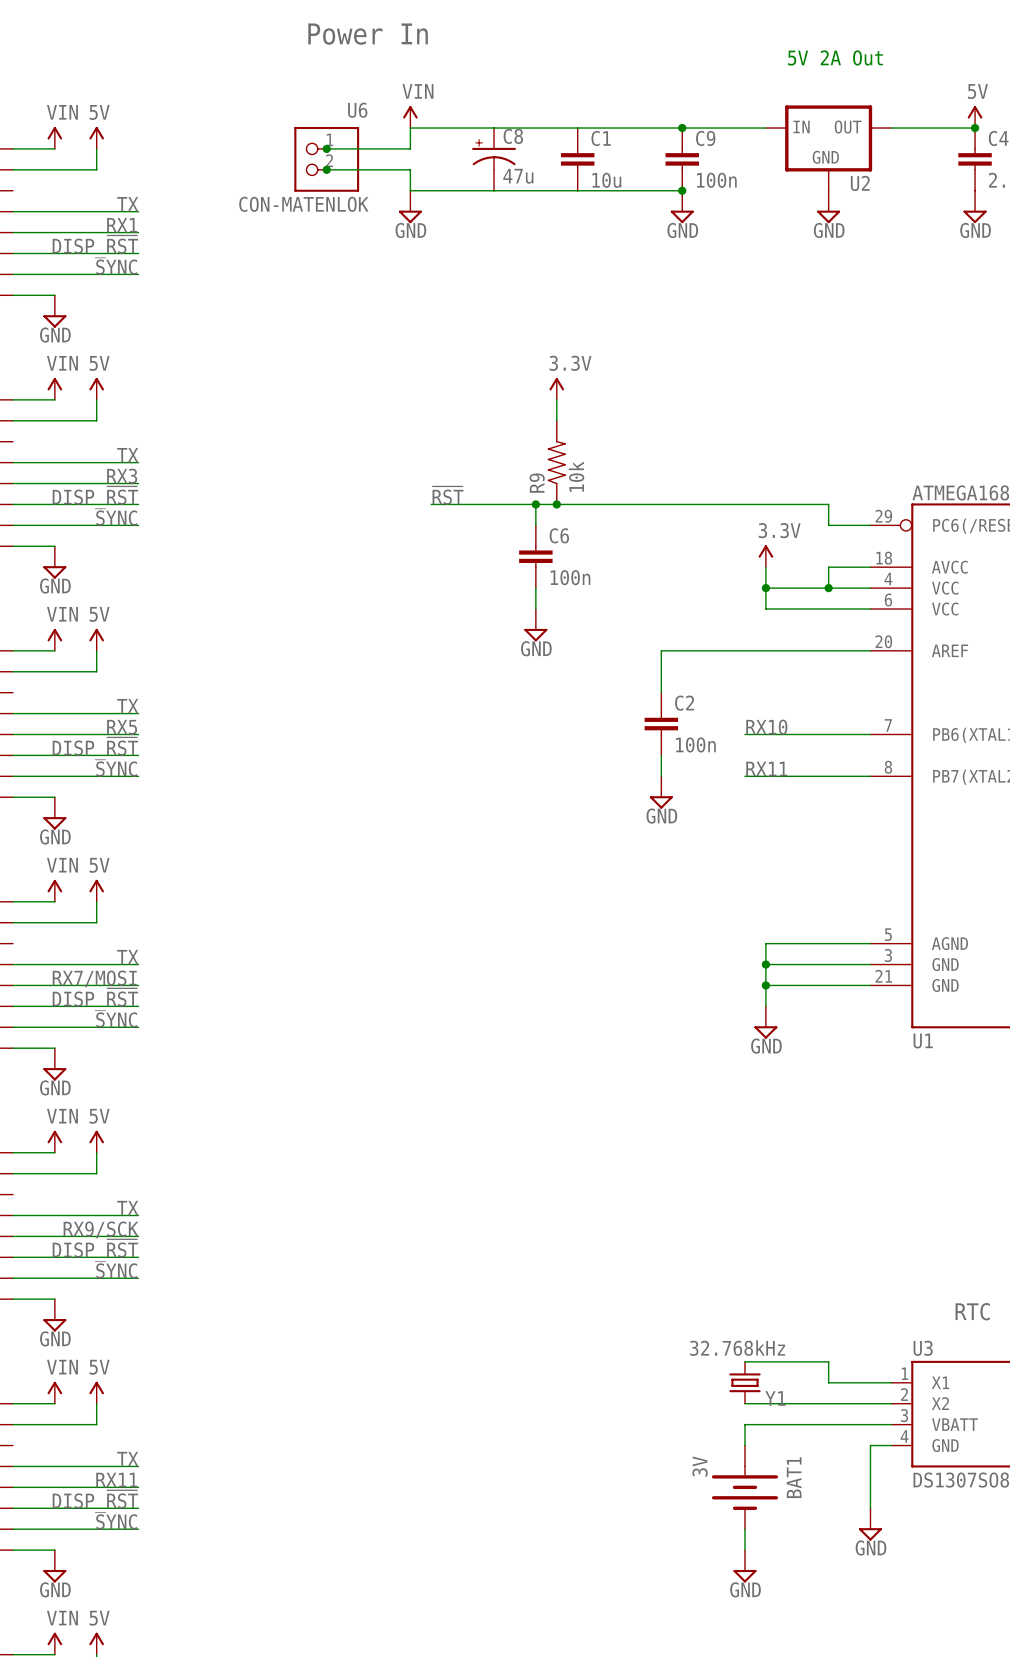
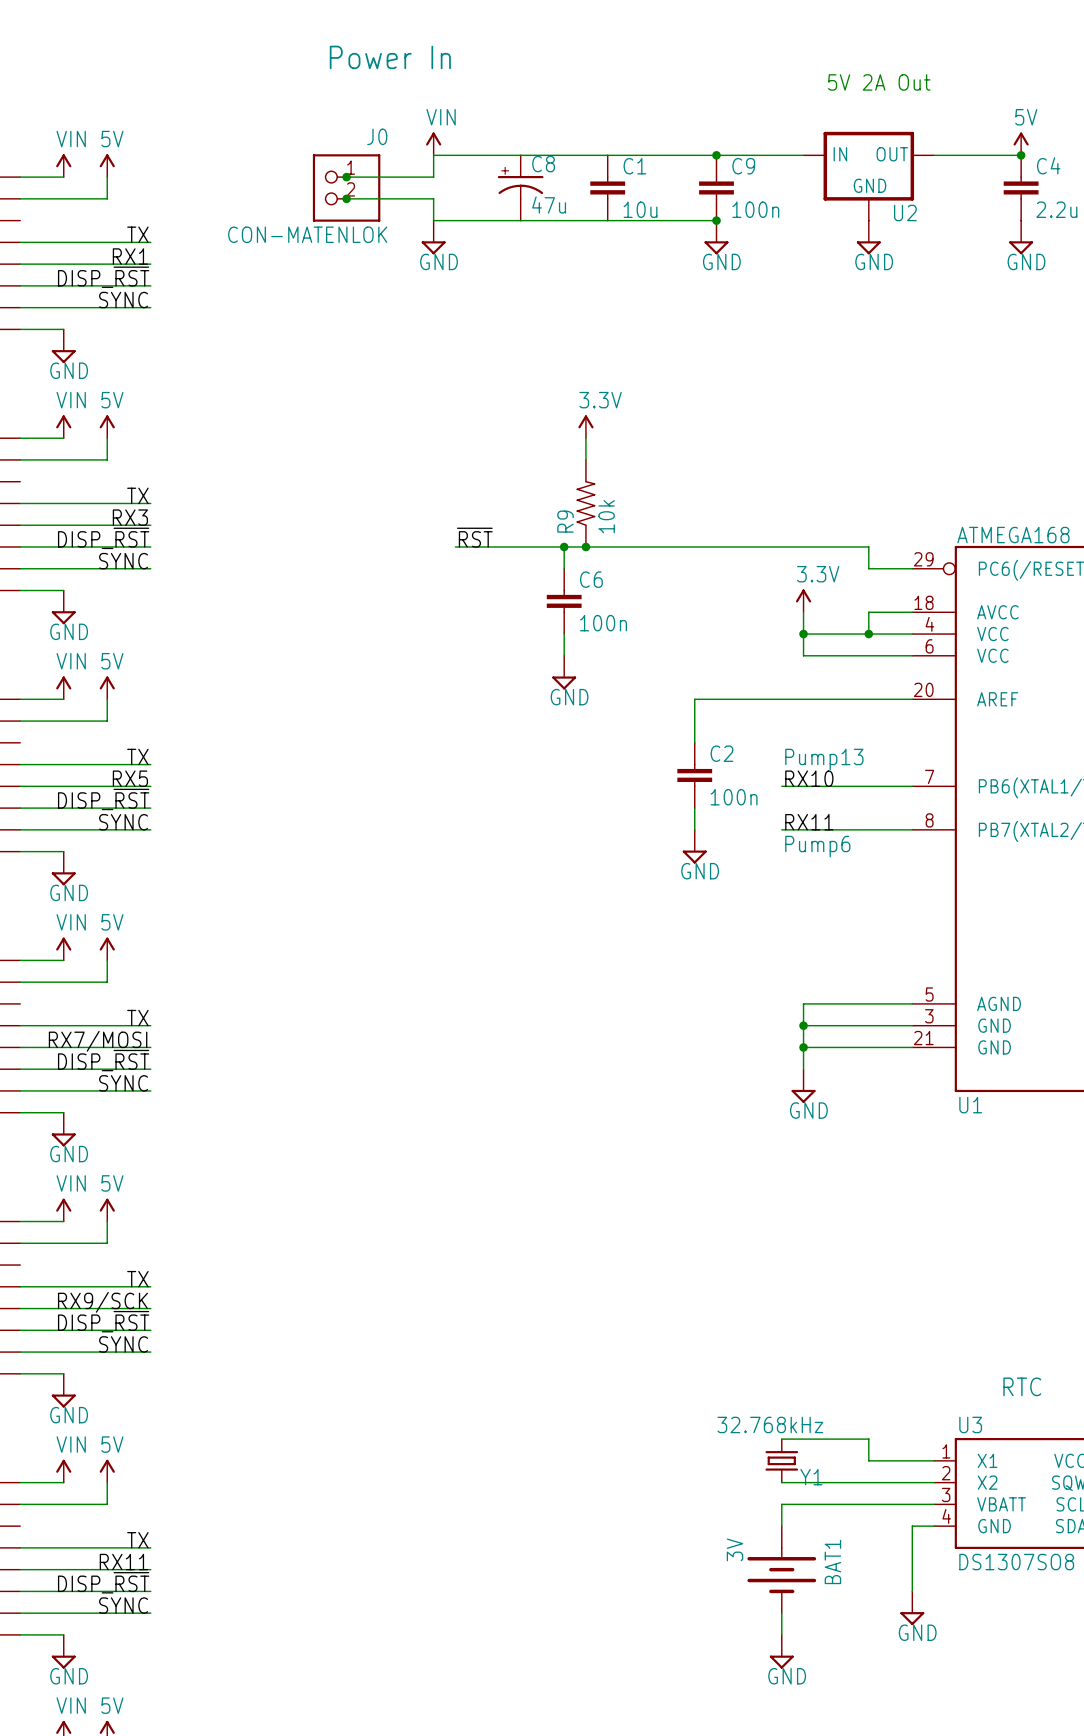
U6 name: U6 (357, 110) -> J0 (377, 136)
text: none -> Pump13 (824, 759)
text: none -> Pump6 (817, 846)

